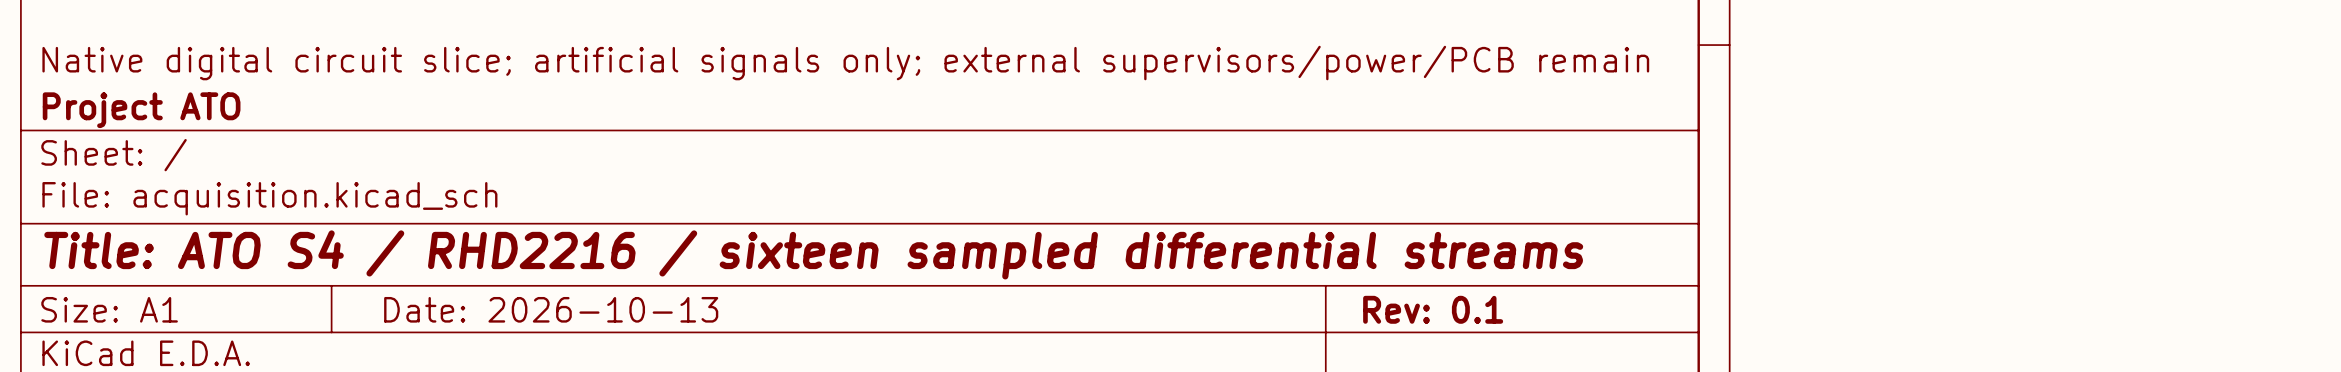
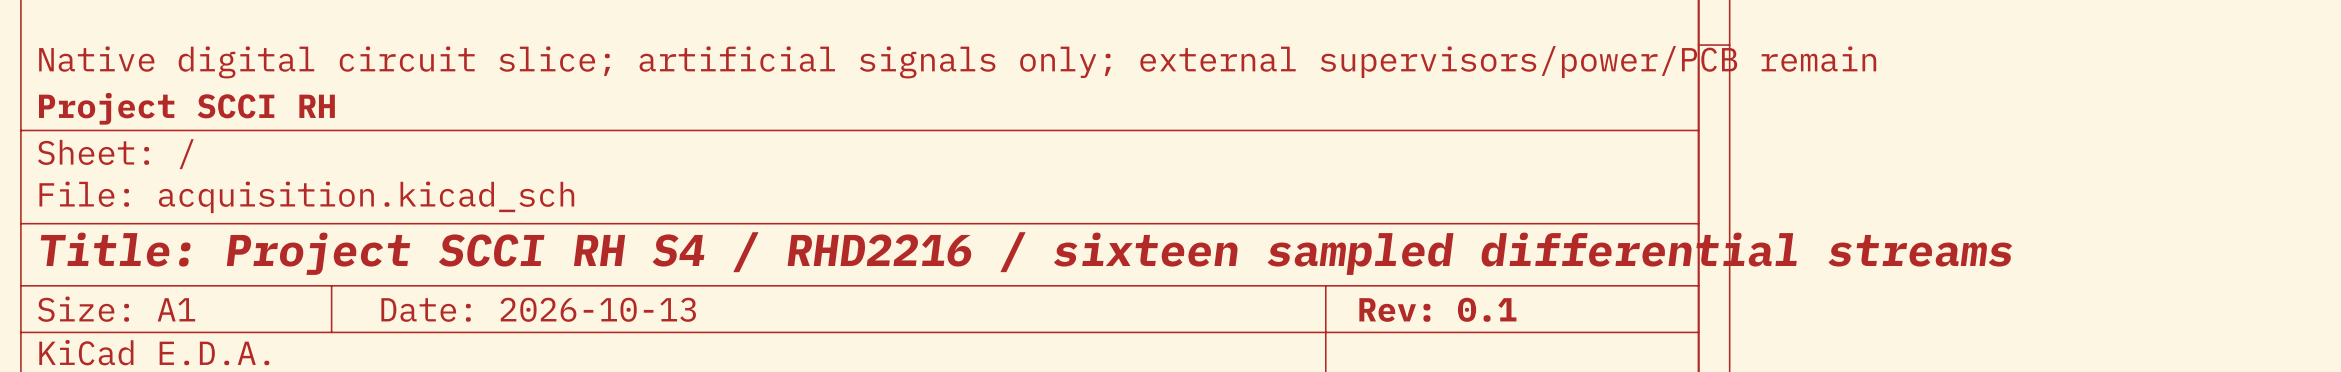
title block: Project ATO (141, 110) -> Project SCCI RH (186, 108)
title block: Title: ATO S4 / RHD2216 / sixteen sampled differential streams (813, 254) -> Title: Project SCCI RH S4 / RHD2216 / sixteen sampled differential streams (1026, 253)

